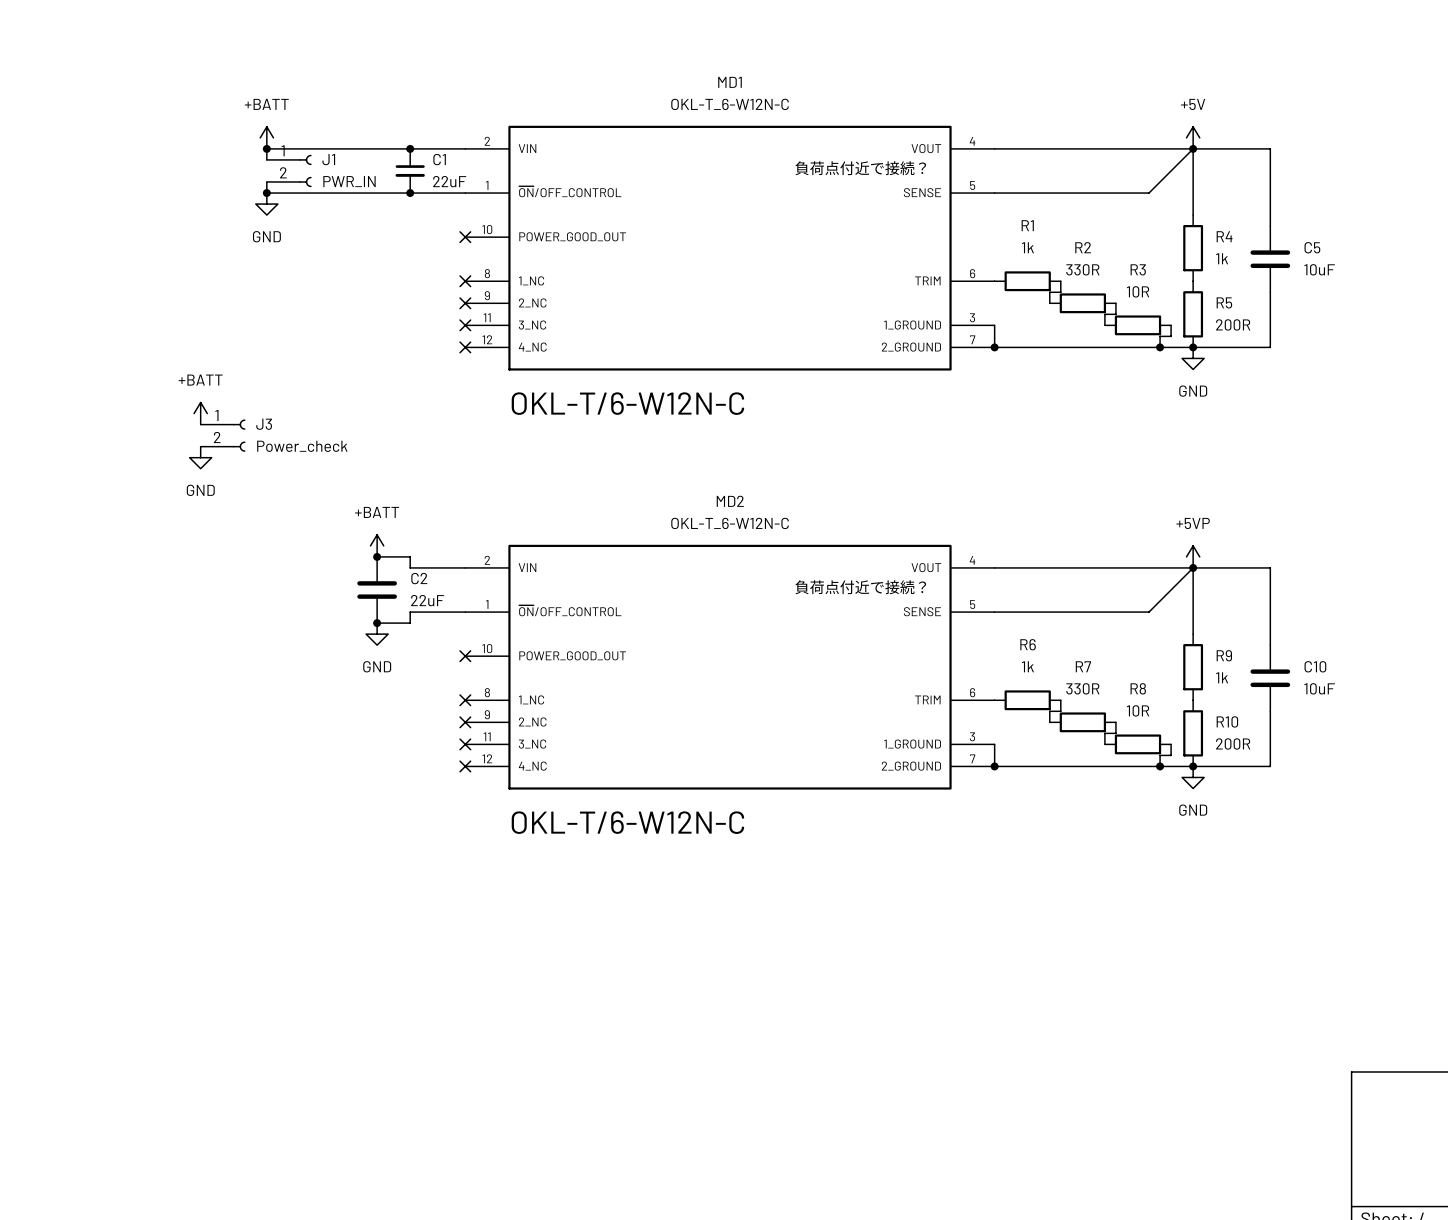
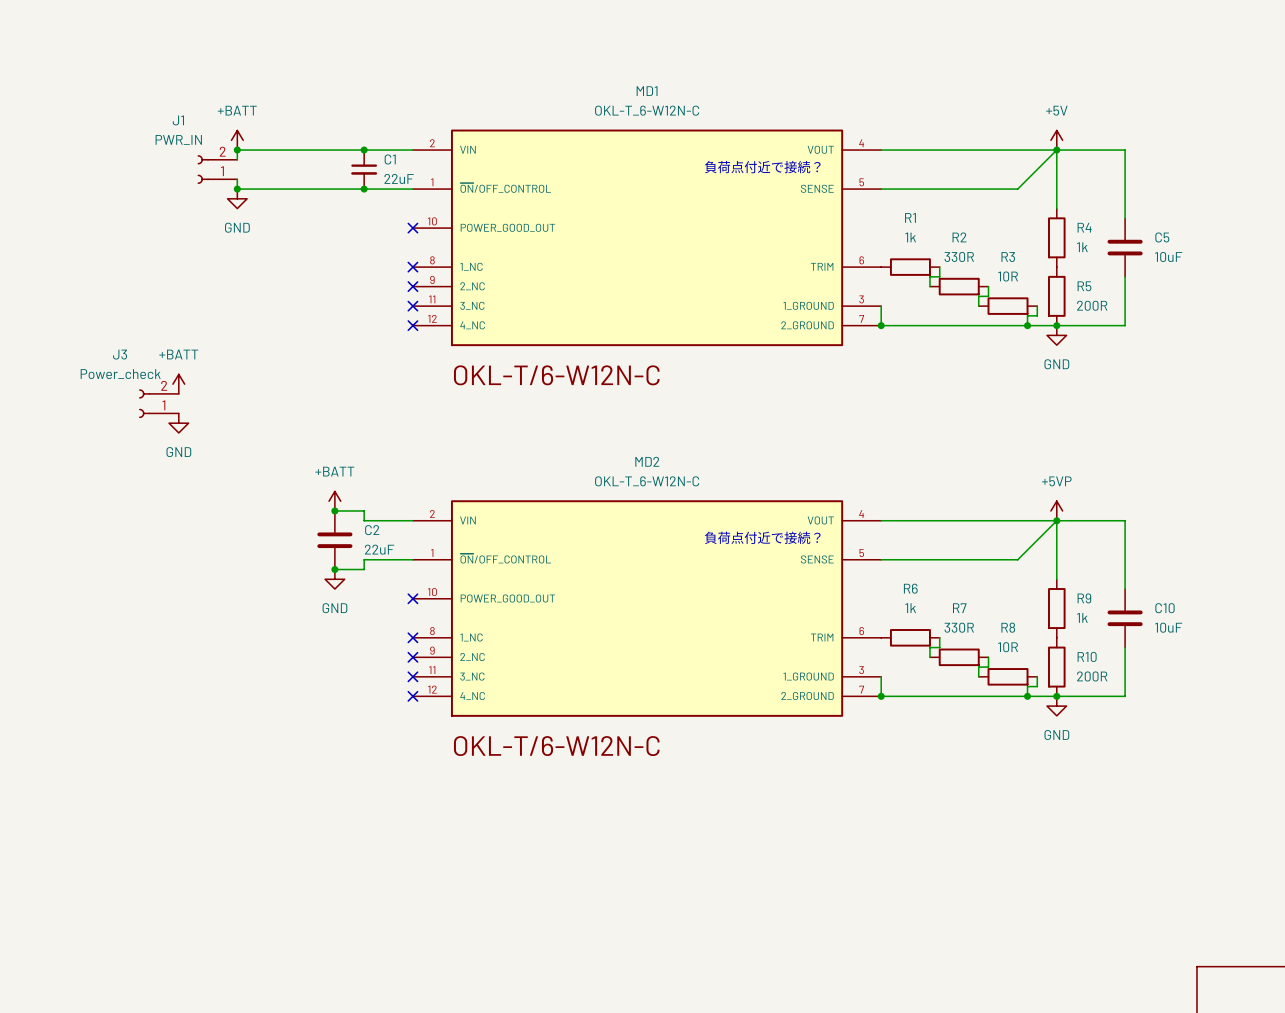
J1 name position: J1 (328, 159) -> J1 (178, 120)
J1 position: (289, 170) -> (217, 169)
J1 rotation: 0° (305, 170) -> 180° (203, 169)
J1 value position: PWR_IN (349, 181) -> PWR_IN (178, 139)
J3 name position: J3 (264, 424) -> J3 (120, 354)
J3 position: (223, 435) -> (158, 403)
J3 rotation: 0° (239, 435) -> 180° (144, 403)
J3 value position: Power_check (302, 446) -> Power_check (120, 374)

